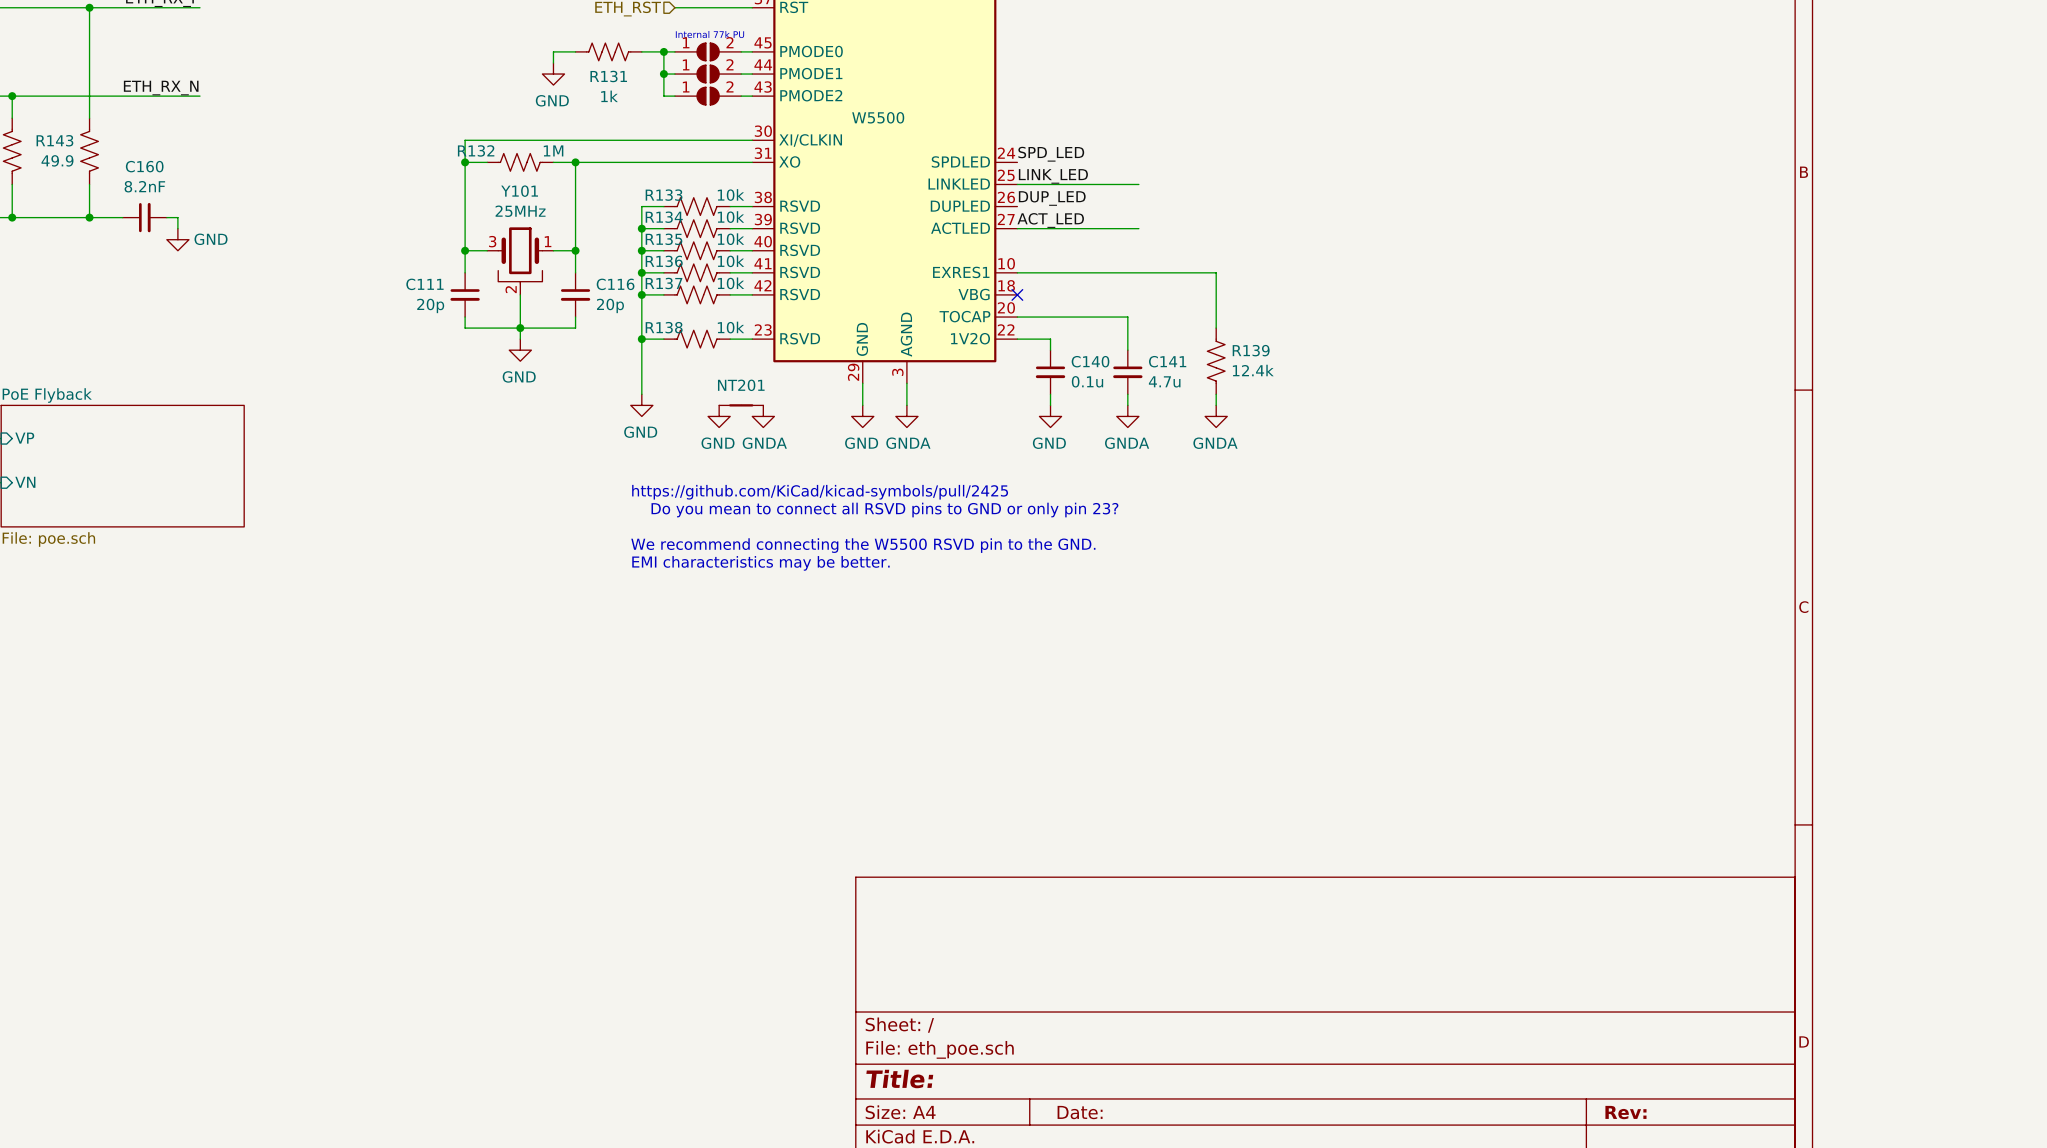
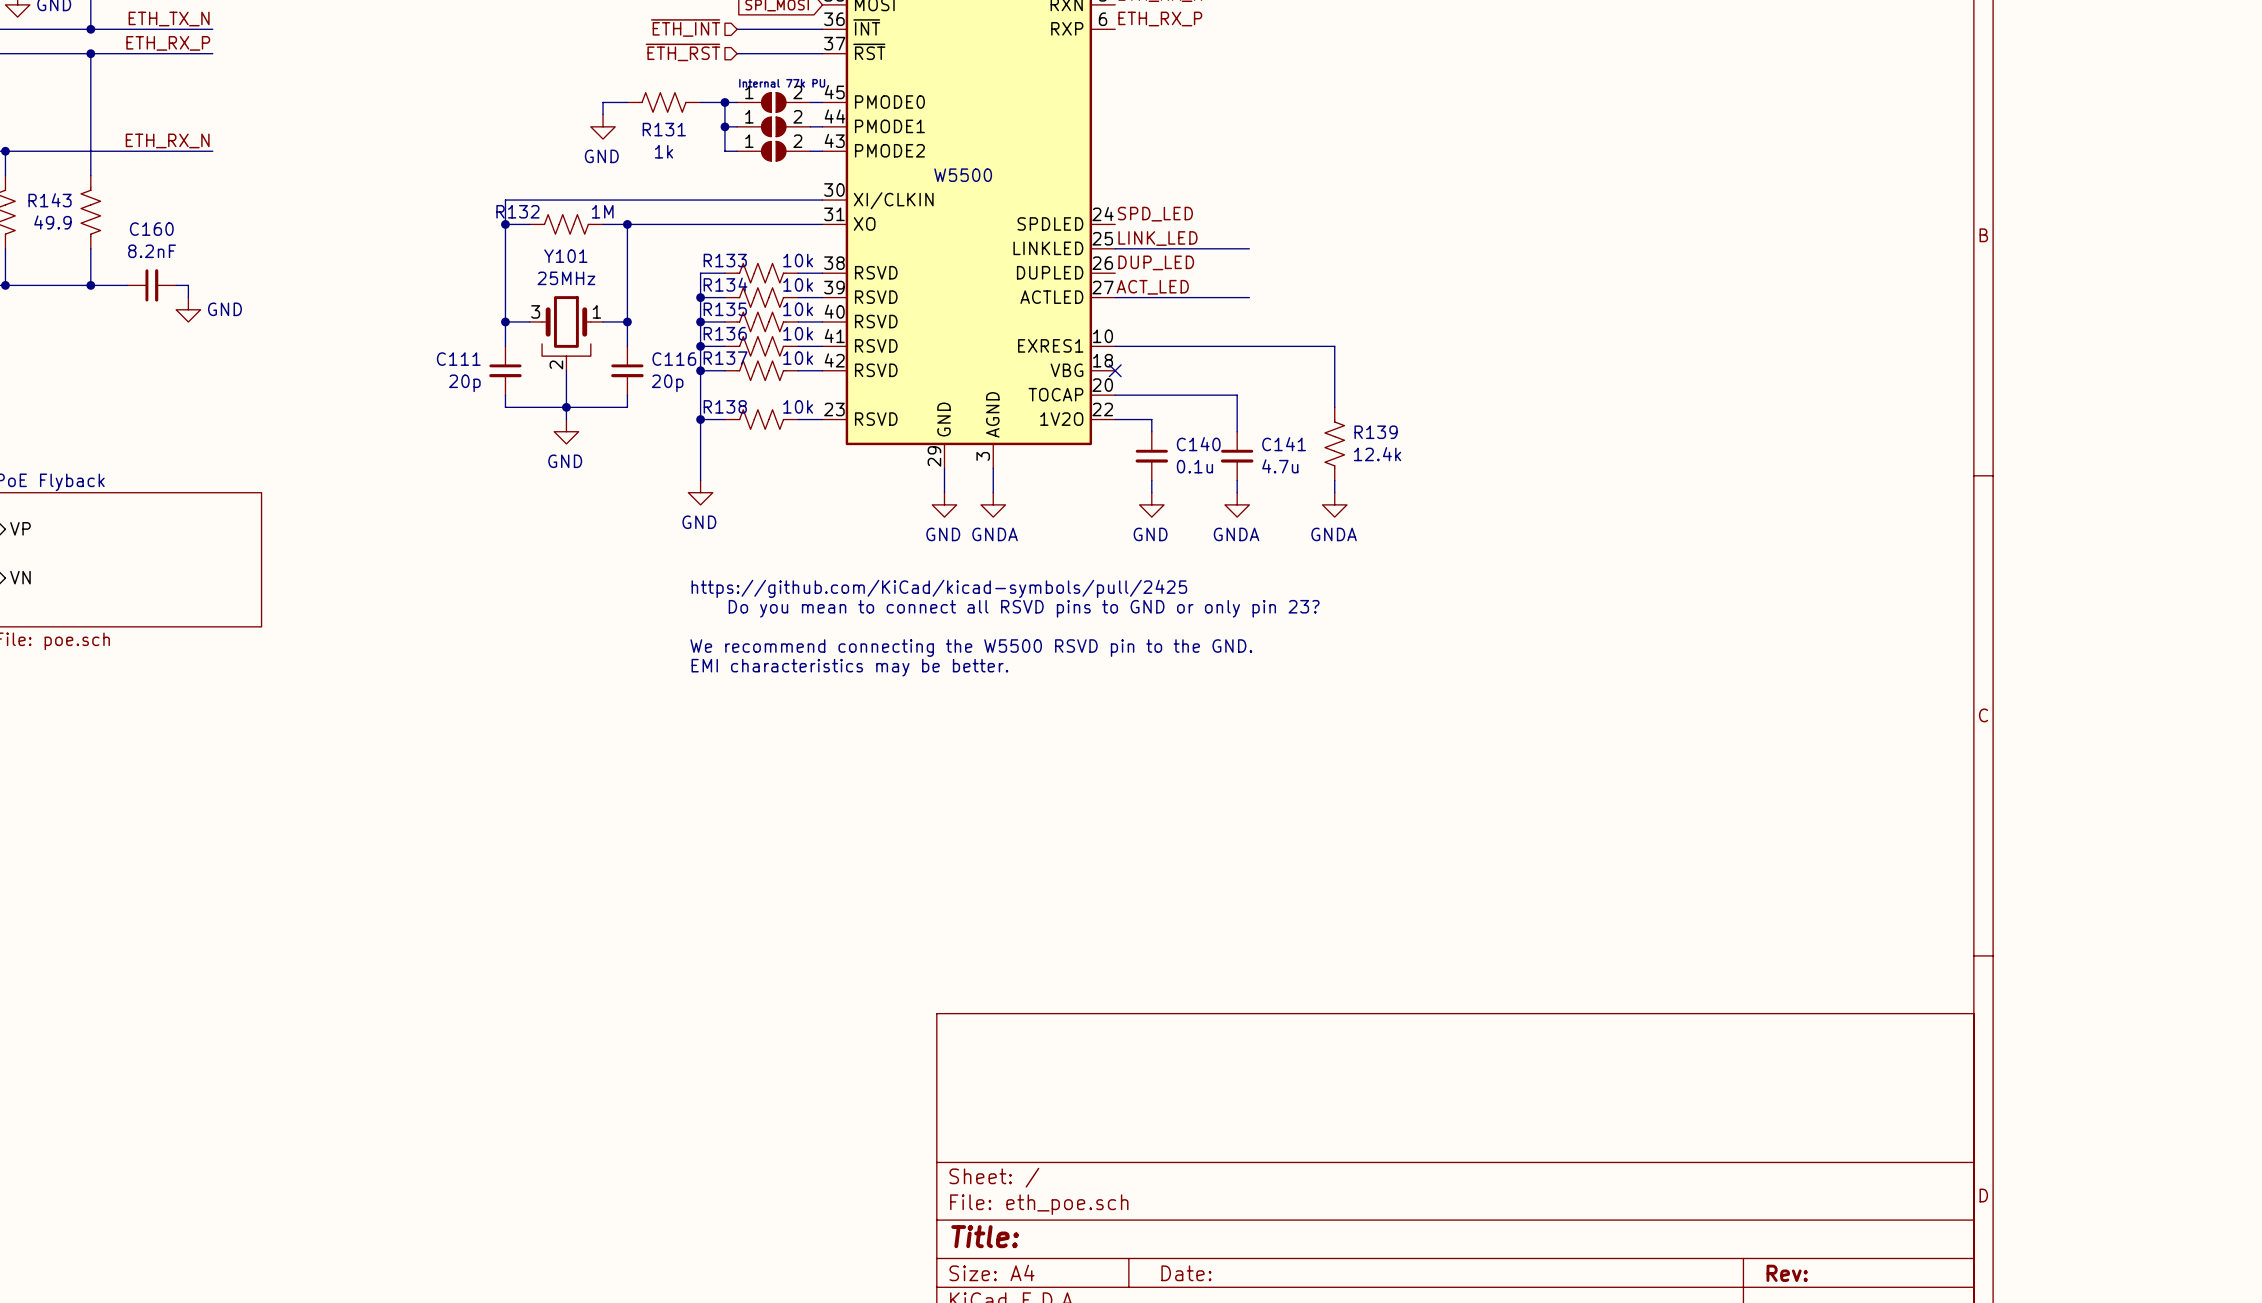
NT201: (741, 405) -> none
power symbol: GND (719, 416) -> none
power symbol: GNDA (763, 416) -> none

